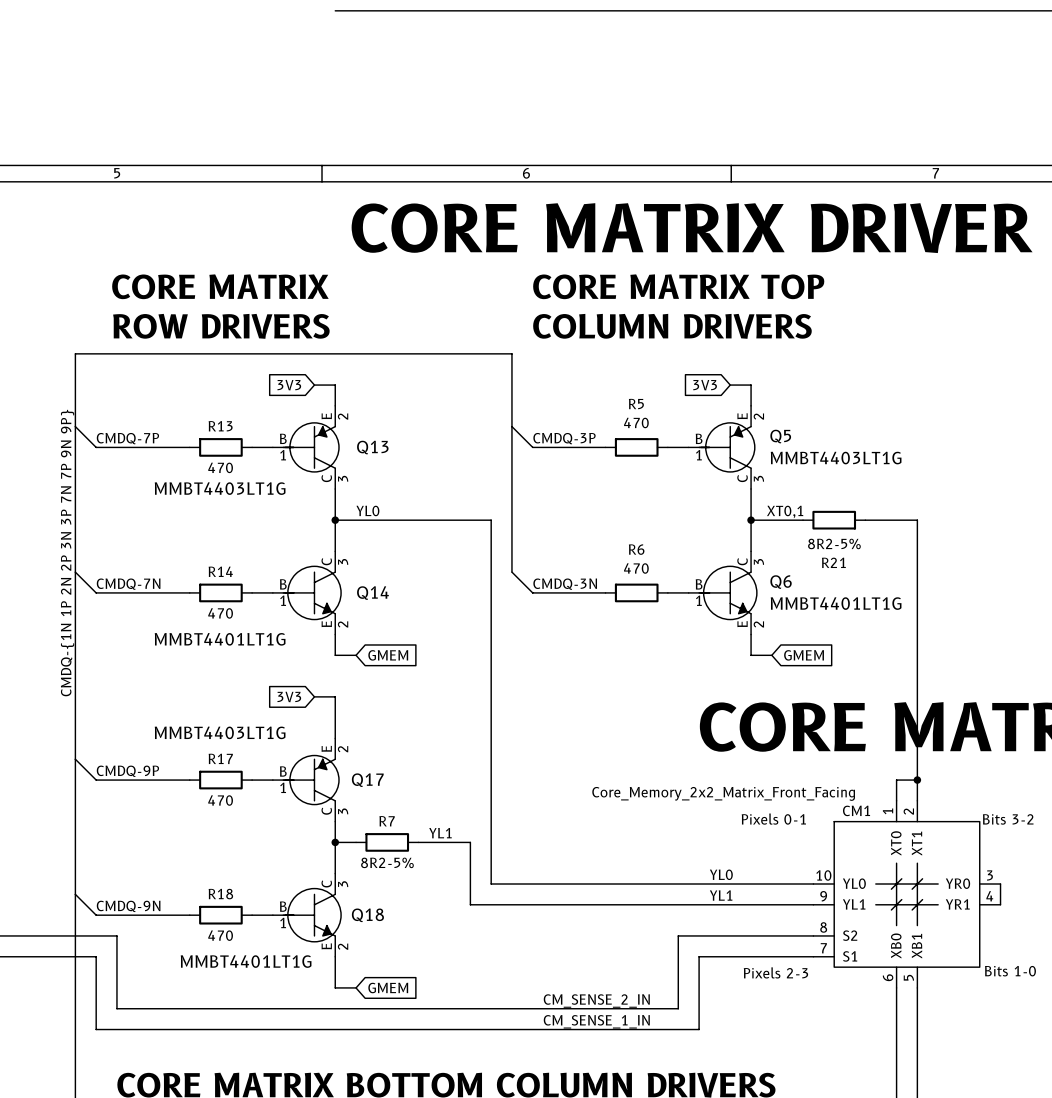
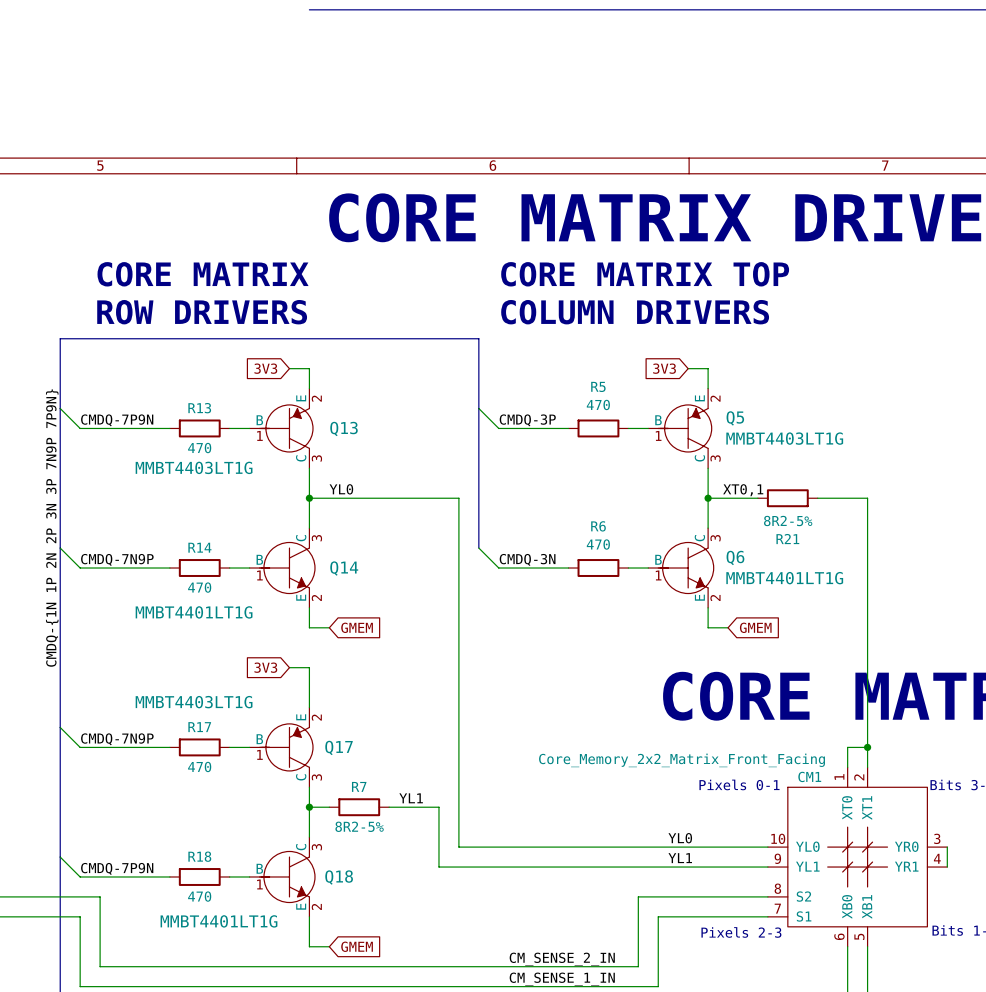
label: CMDQ-7P (127, 438) -> CMDQ-7P9N (117, 420)
label: CMDQ-{1N 1P 2N 2P 3N 3P 7N 7P 9N 9P} (67, 553) -> CMDQ-{1N 1P 2N 2P 3N 3P 7N9P 7P9N} (52, 528)
label: CMDQ-7N (128, 584) -> CMDQ-7N9P (117, 559)
label: CMDQ-9P (127, 771) -> CMDQ-7N9P (117, 739)
label: CMDQ-9N (128, 906) -> CMDQ-7P9N (117, 868)

